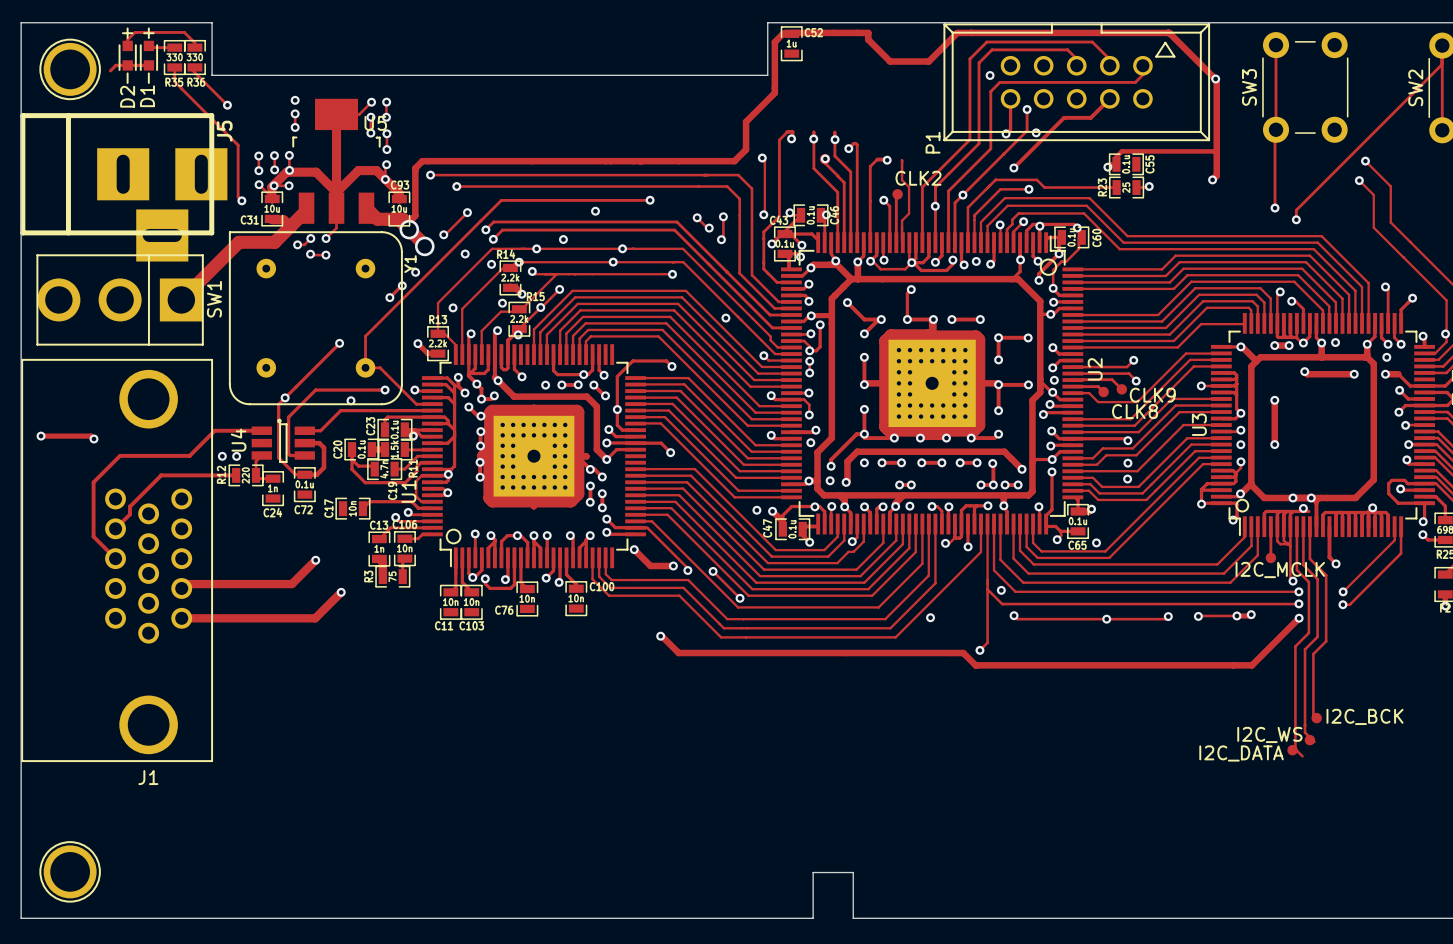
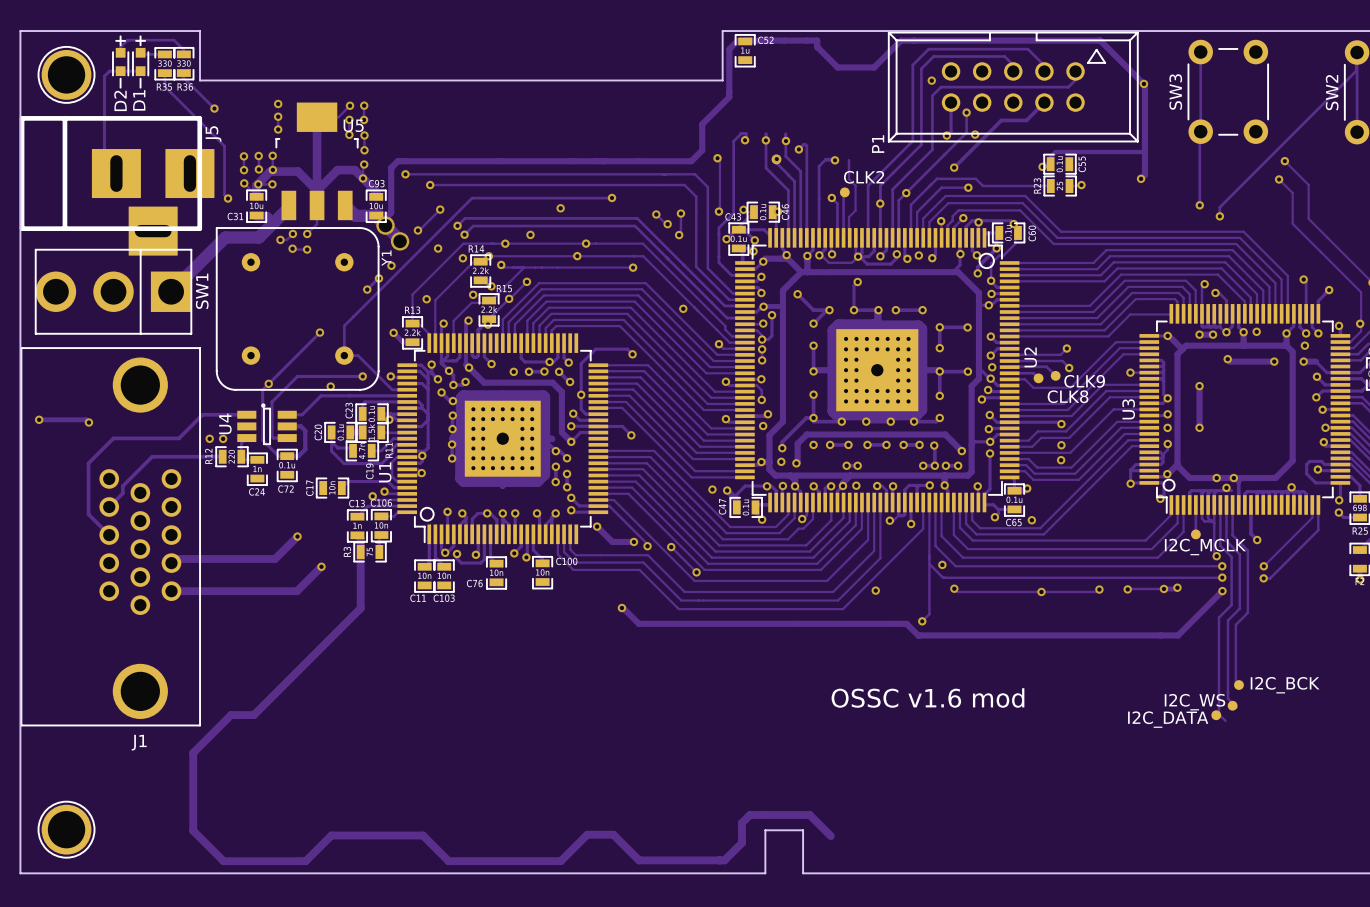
track: none -> (104, 76) (104, 161) (116, 173)
track: none -> (360, 551) (360, 608) (253, 715) (231, 715) (193, 752) (193, 830) (223, 861) (305, 861) (331, 835) (422, 835) (448, 861) (560, 861) (587, 834) (613, 834) (639, 860) (724, 860) (741, 842) (741, 823) (750, 814) (809, 814) (830, 836)
text: none -> OSSC v1.6 mod (927, 697)

